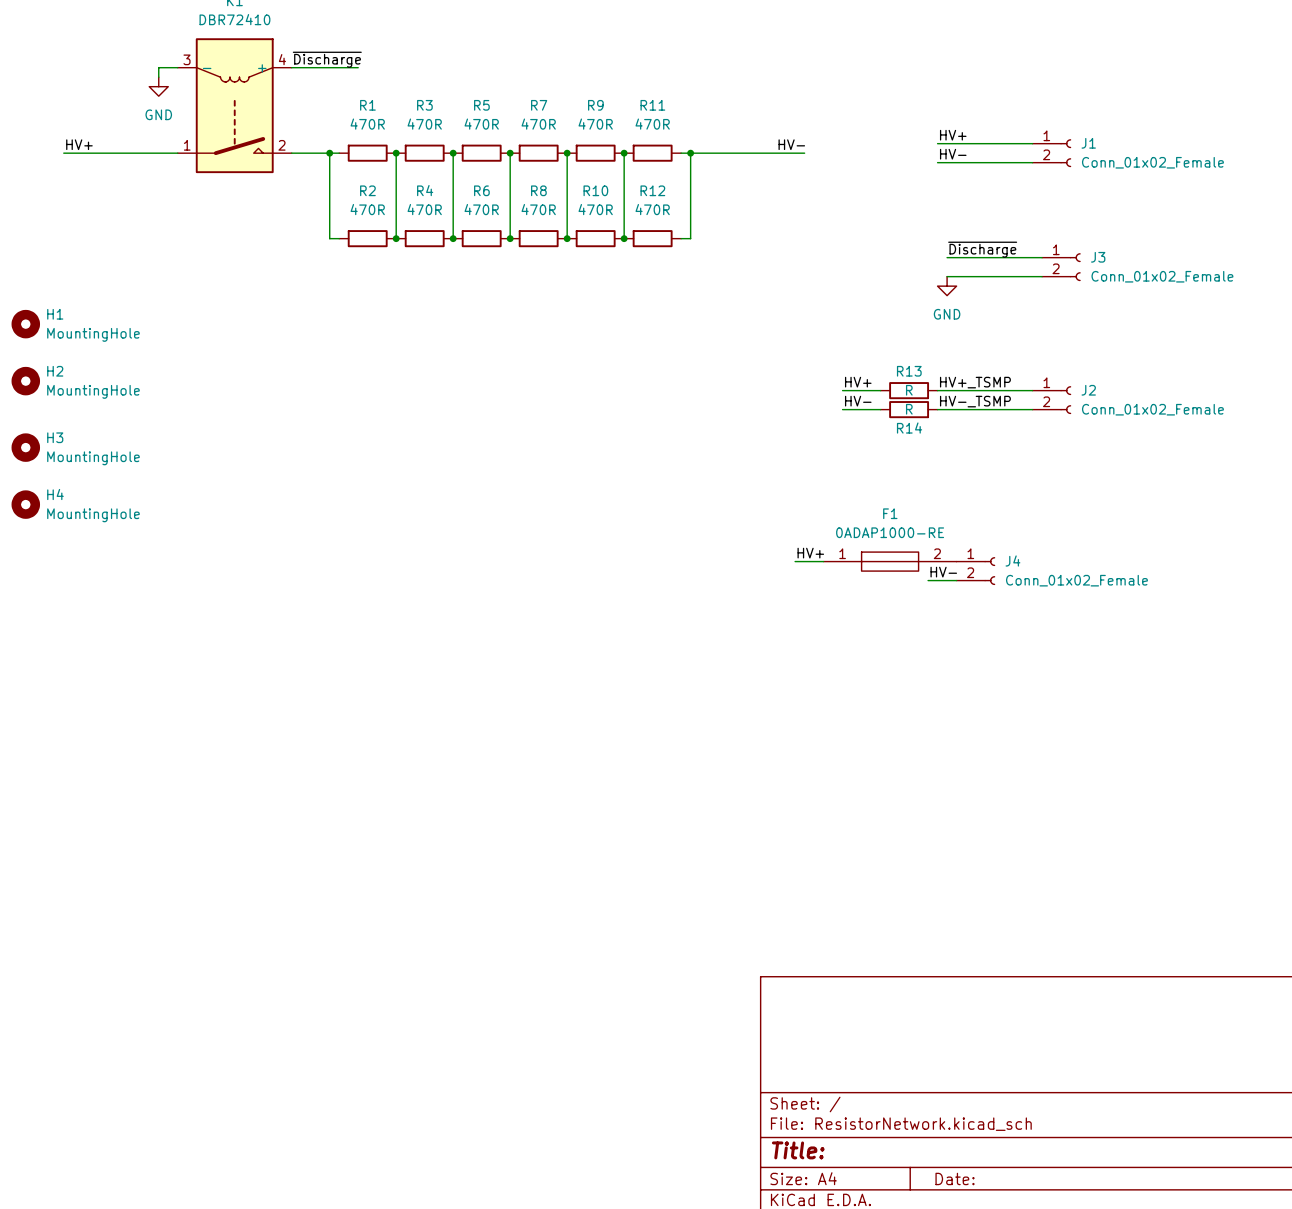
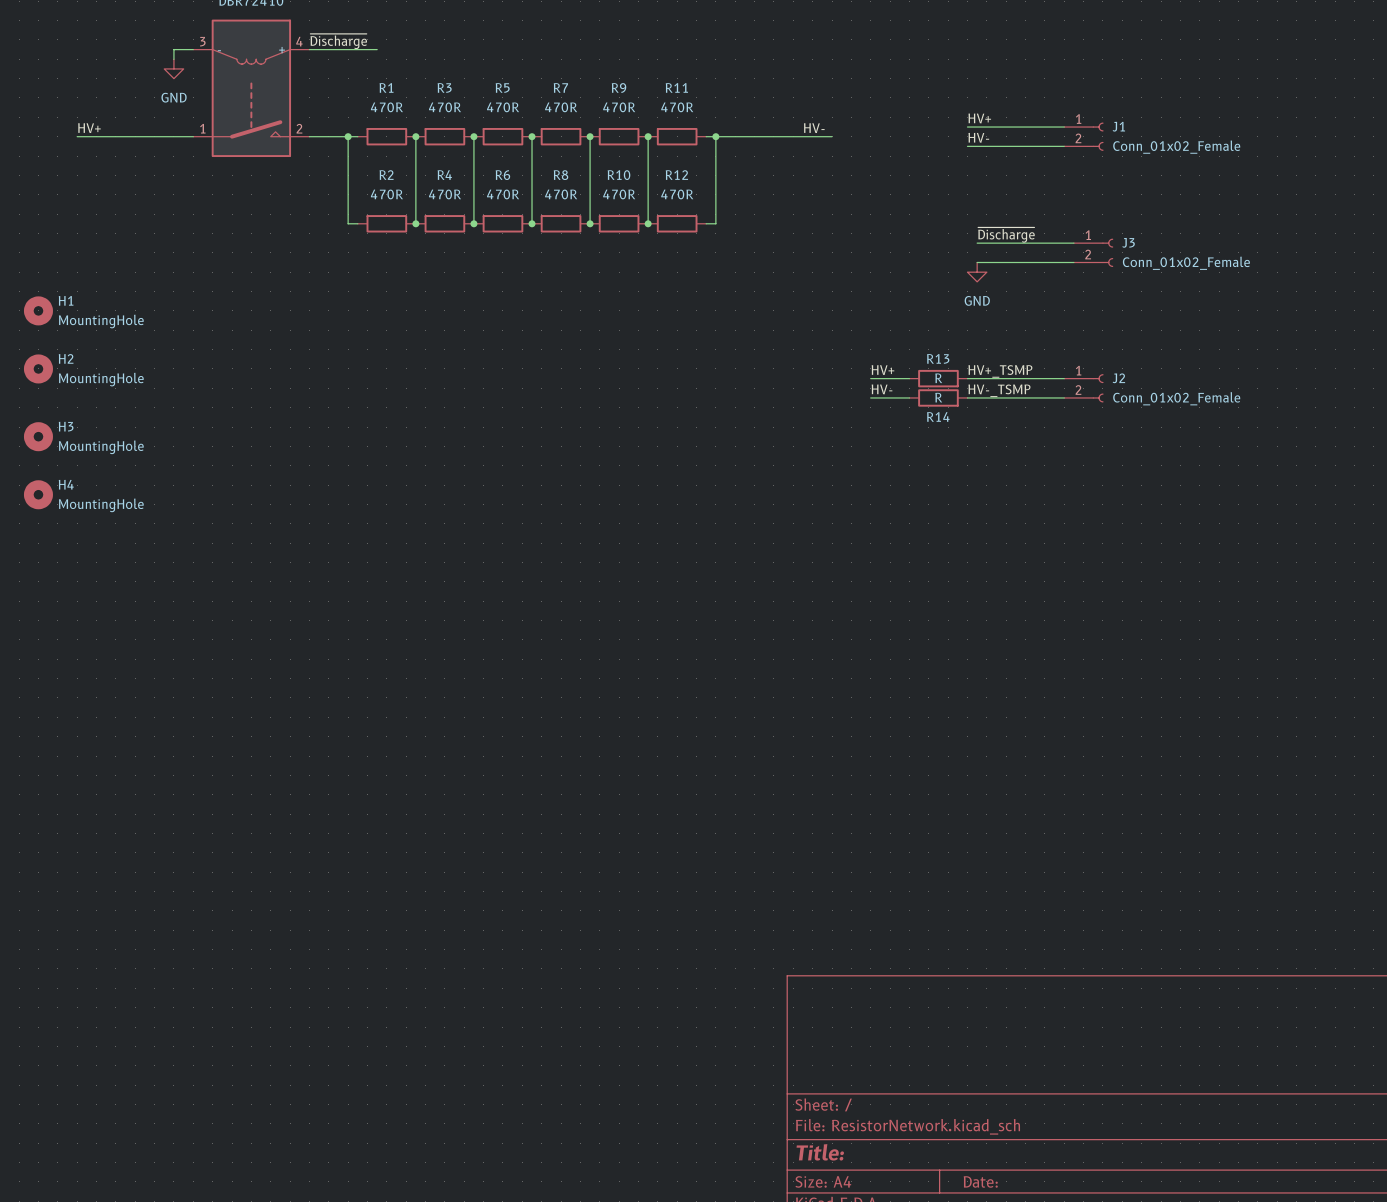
label: HV+ (810, 553) -> none
wire: (795, 561) (823, 561) -> none
F1: 0ADAP1000-RE (890, 561) -> none
J4: Conn_01x02_Female (975, 571) -> none
label: HV- (943, 572) -> none
wire: (928, 580) (956, 580) -> none

